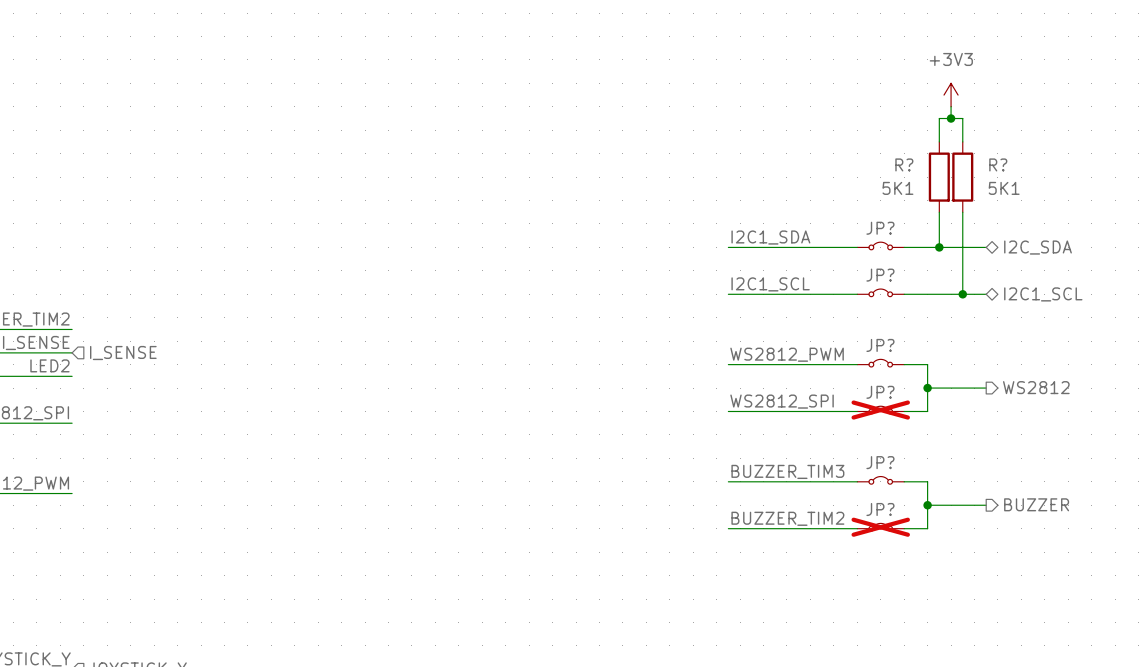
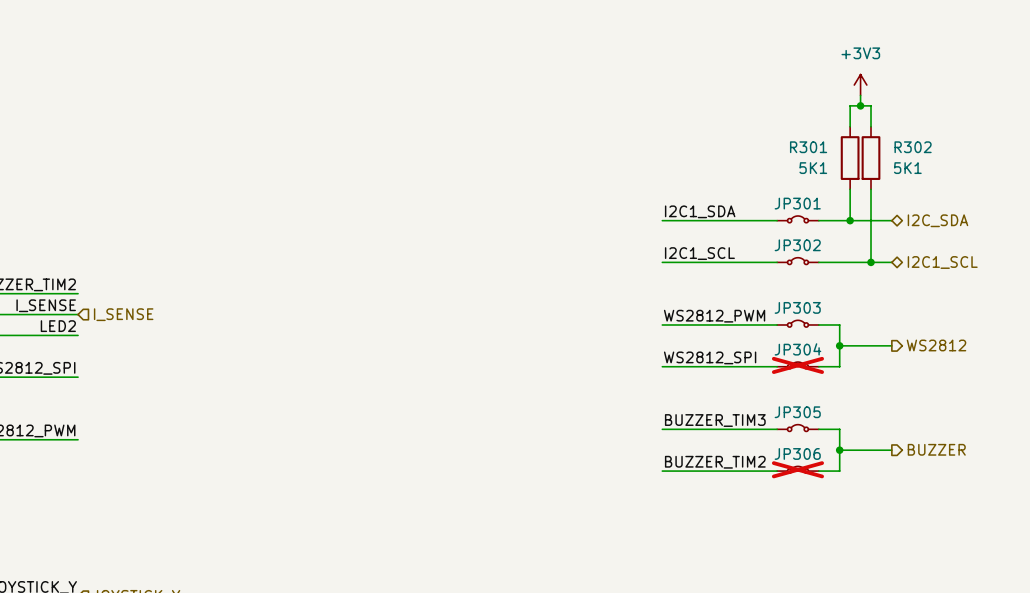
R? name: R? (904, 164) -> R301 (808, 147)
R? name: R? (998, 164) -> R302 (913, 147)
JP? name: JP? (880, 228) -> JP301 (797, 203)
JP? name: JP? (880, 275) -> JP302 (797, 245)
JP? name: JP? (880, 345) -> JP303 (797, 307)
JP? name: JP? (880, 392) -> JP304 (797, 349)
JP? name: JP? (880, 462) -> JP305 (797, 412)
JP? name: JP? (880, 509) -> JP306 (797, 453)

